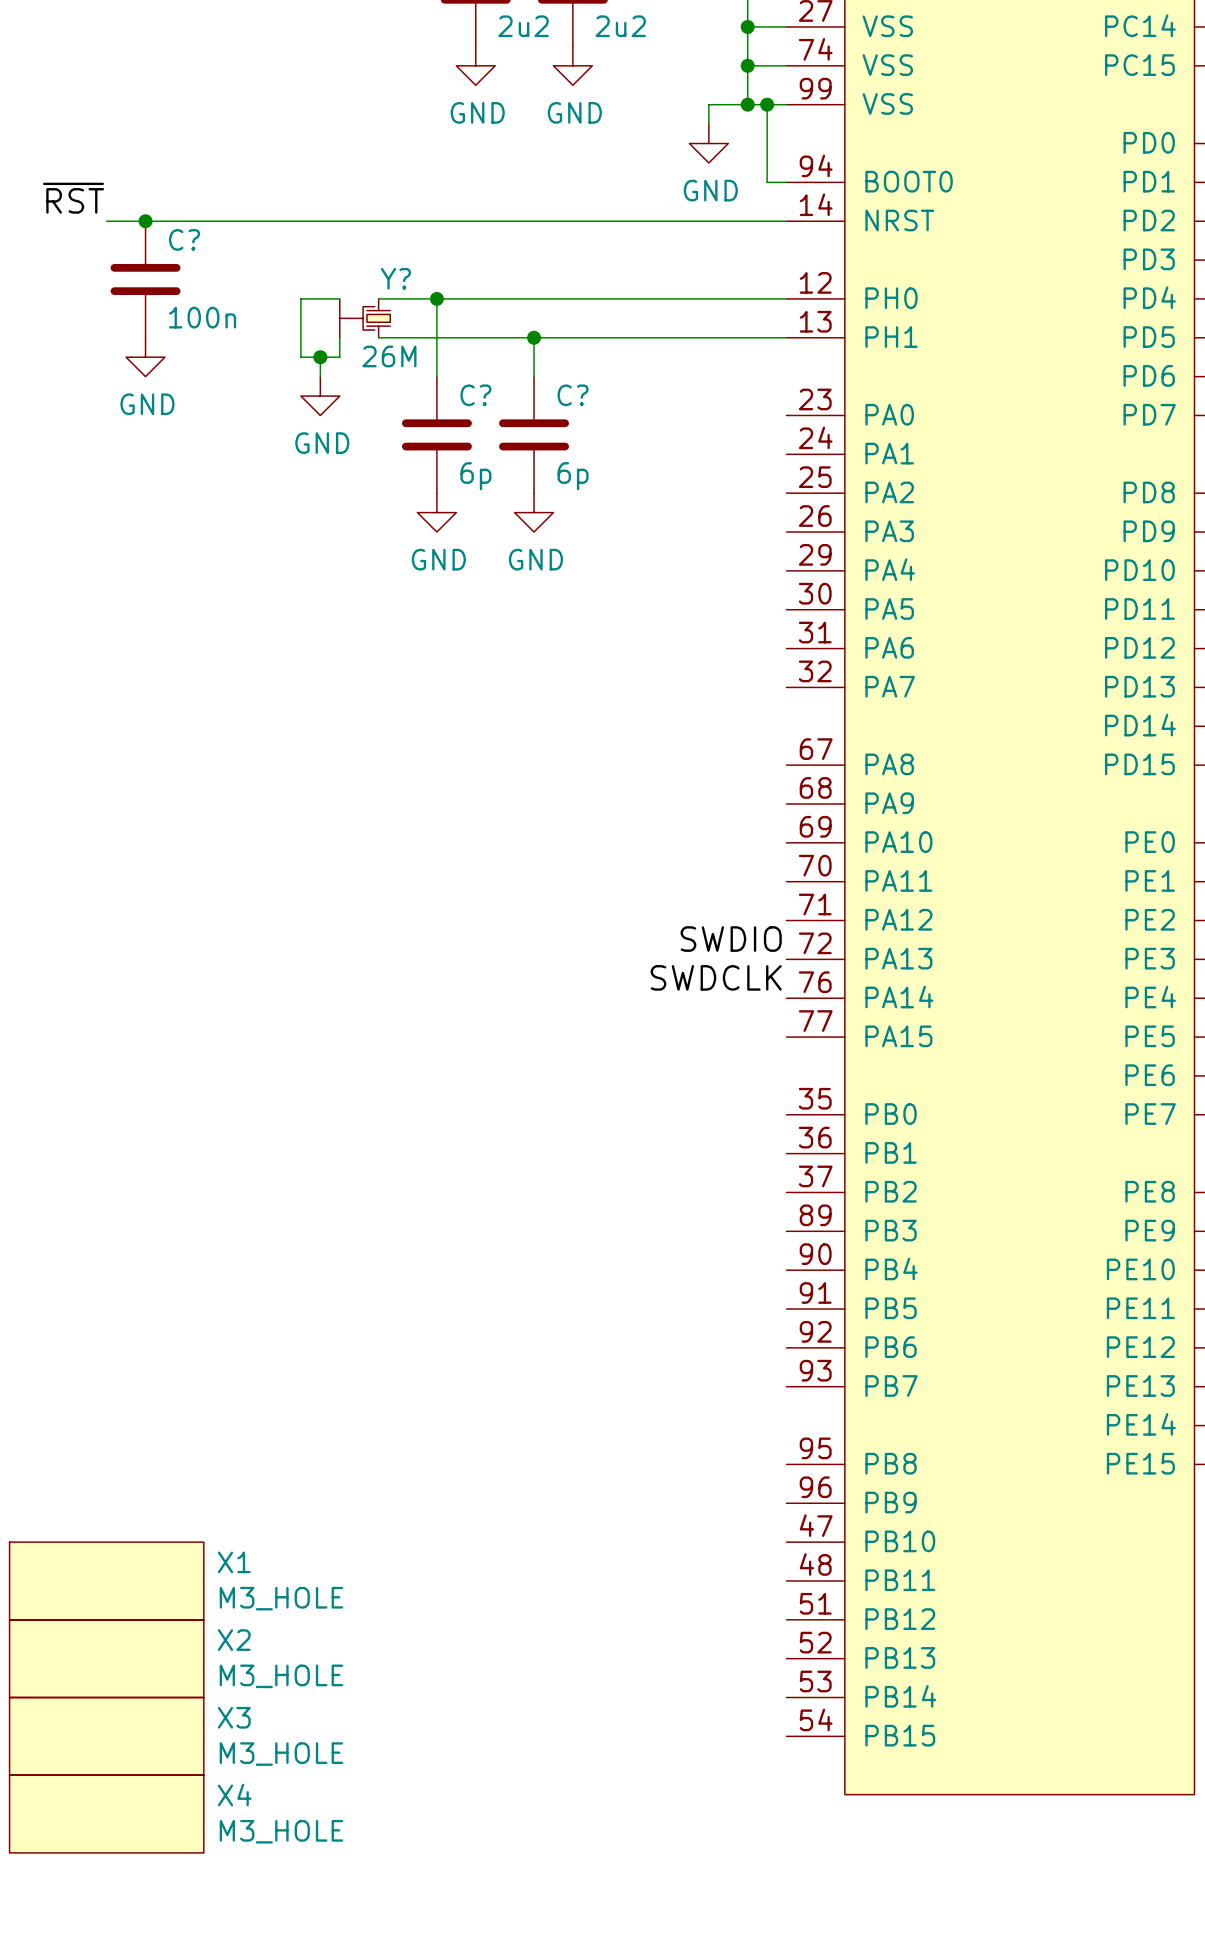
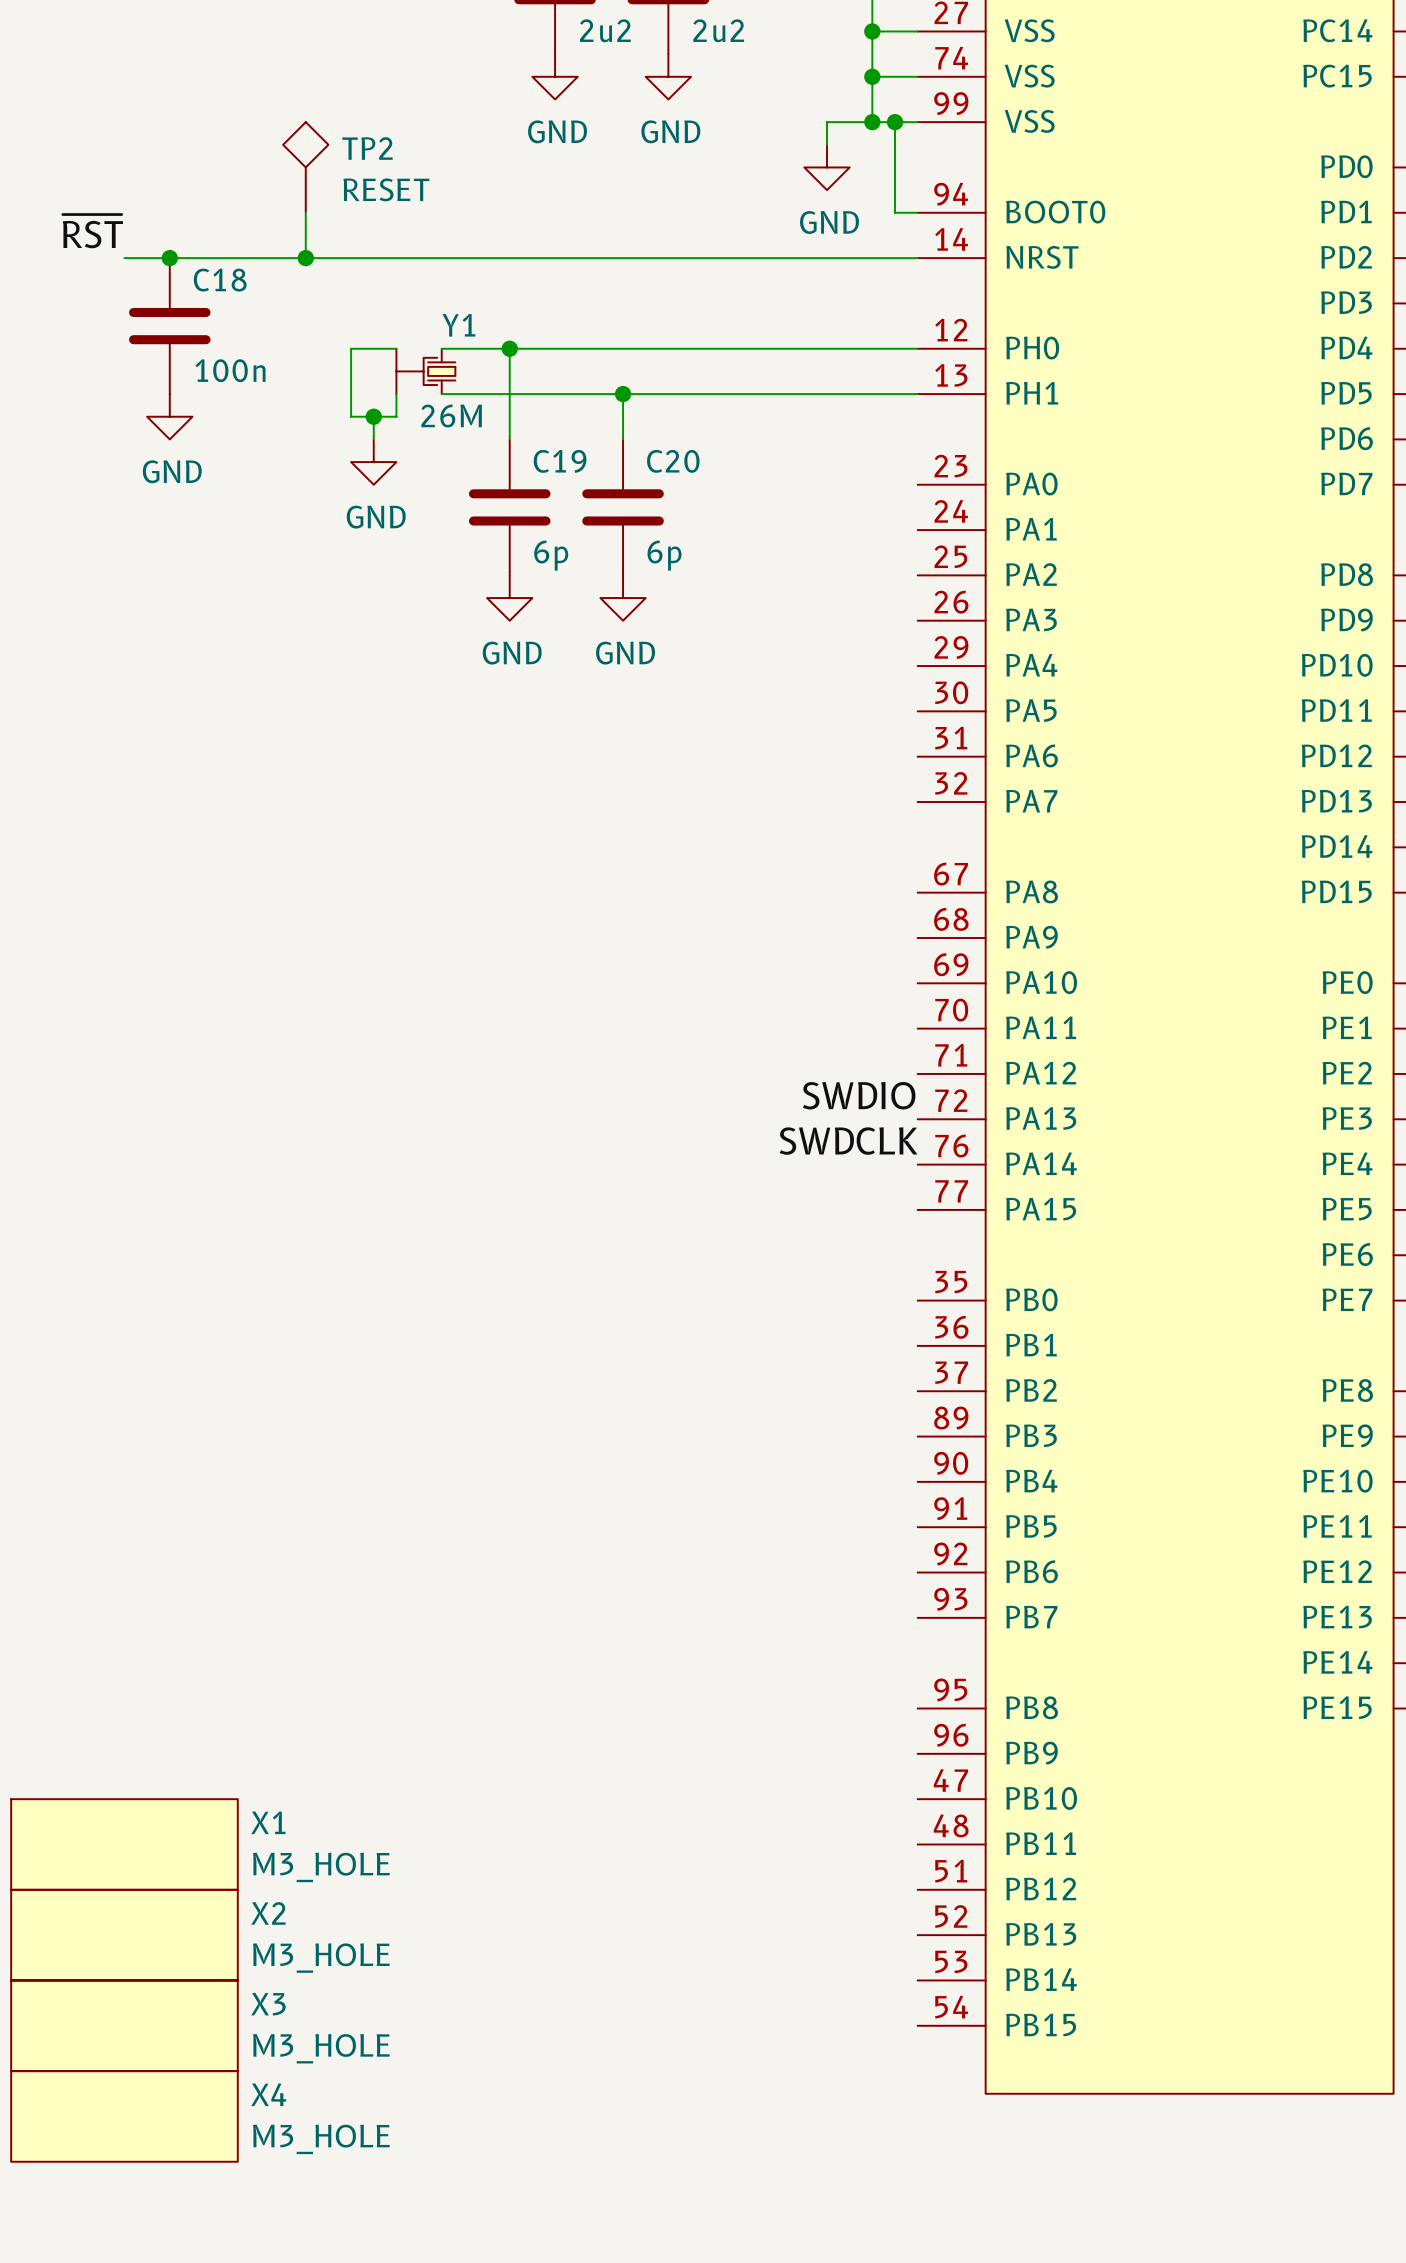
TP2: none -> RESET (305, 167)
wire: none -> (305, 212) (305, 258)
junction: none -> (305, 258)
C? name: C? (184, 239) -> C18 (220, 280)
Y? name: Y? (395, 278) -> Y1 (458, 325)
C? name: C? (475, 395) -> C19 (560, 461)
C? name: C? (573, 395) -> C20 (673, 461)

